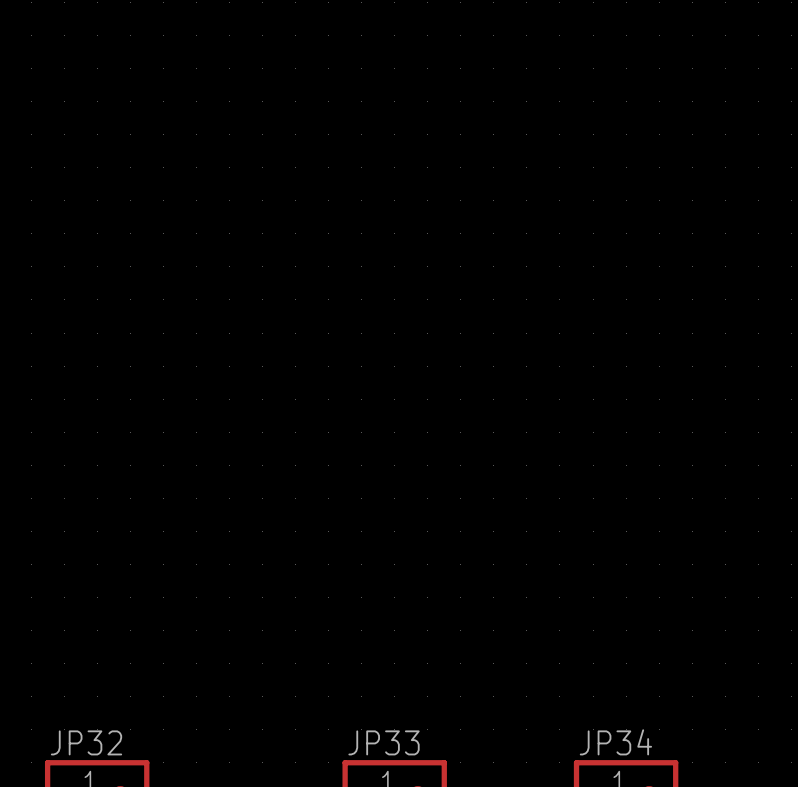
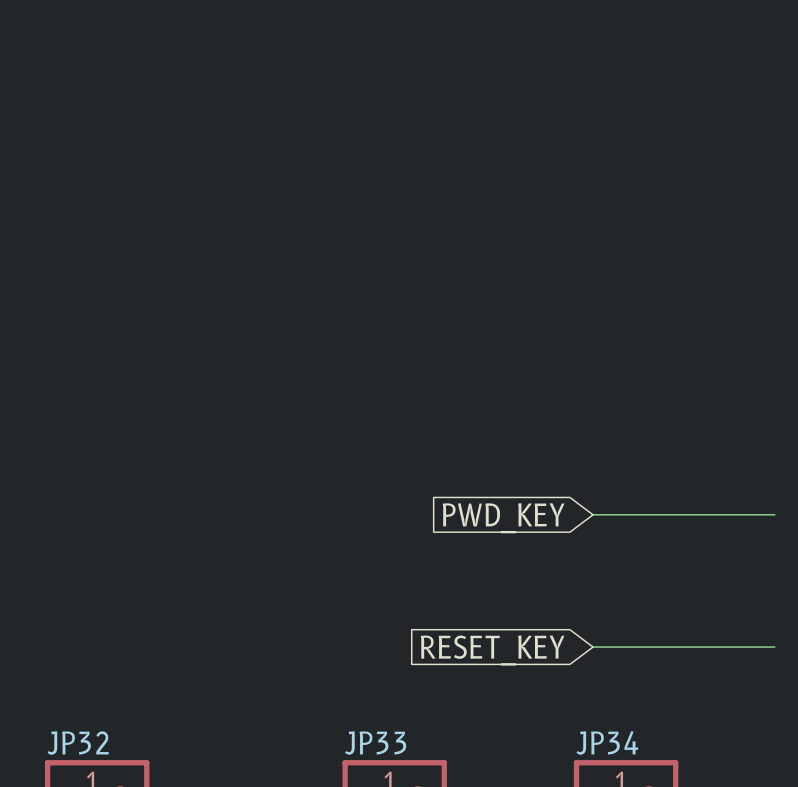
wire: none -> (593, 514) (774, 514)
global label: none -> PWD_KEY (503, 518)
wire: none -> (593, 647) (774, 647)
global label: none -> RESET_KEY (492, 650)

